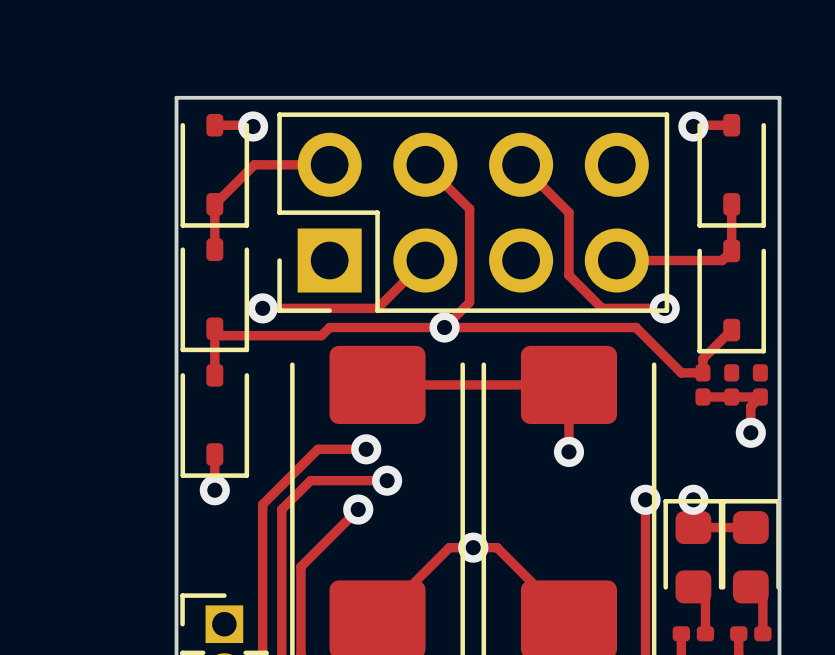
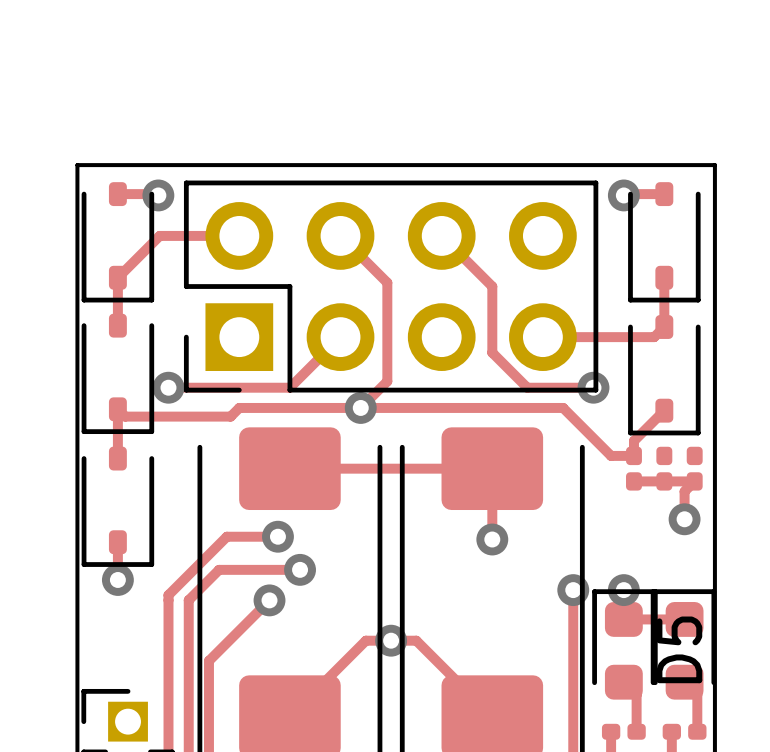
D5 name: none -> D5 (679, 649)

